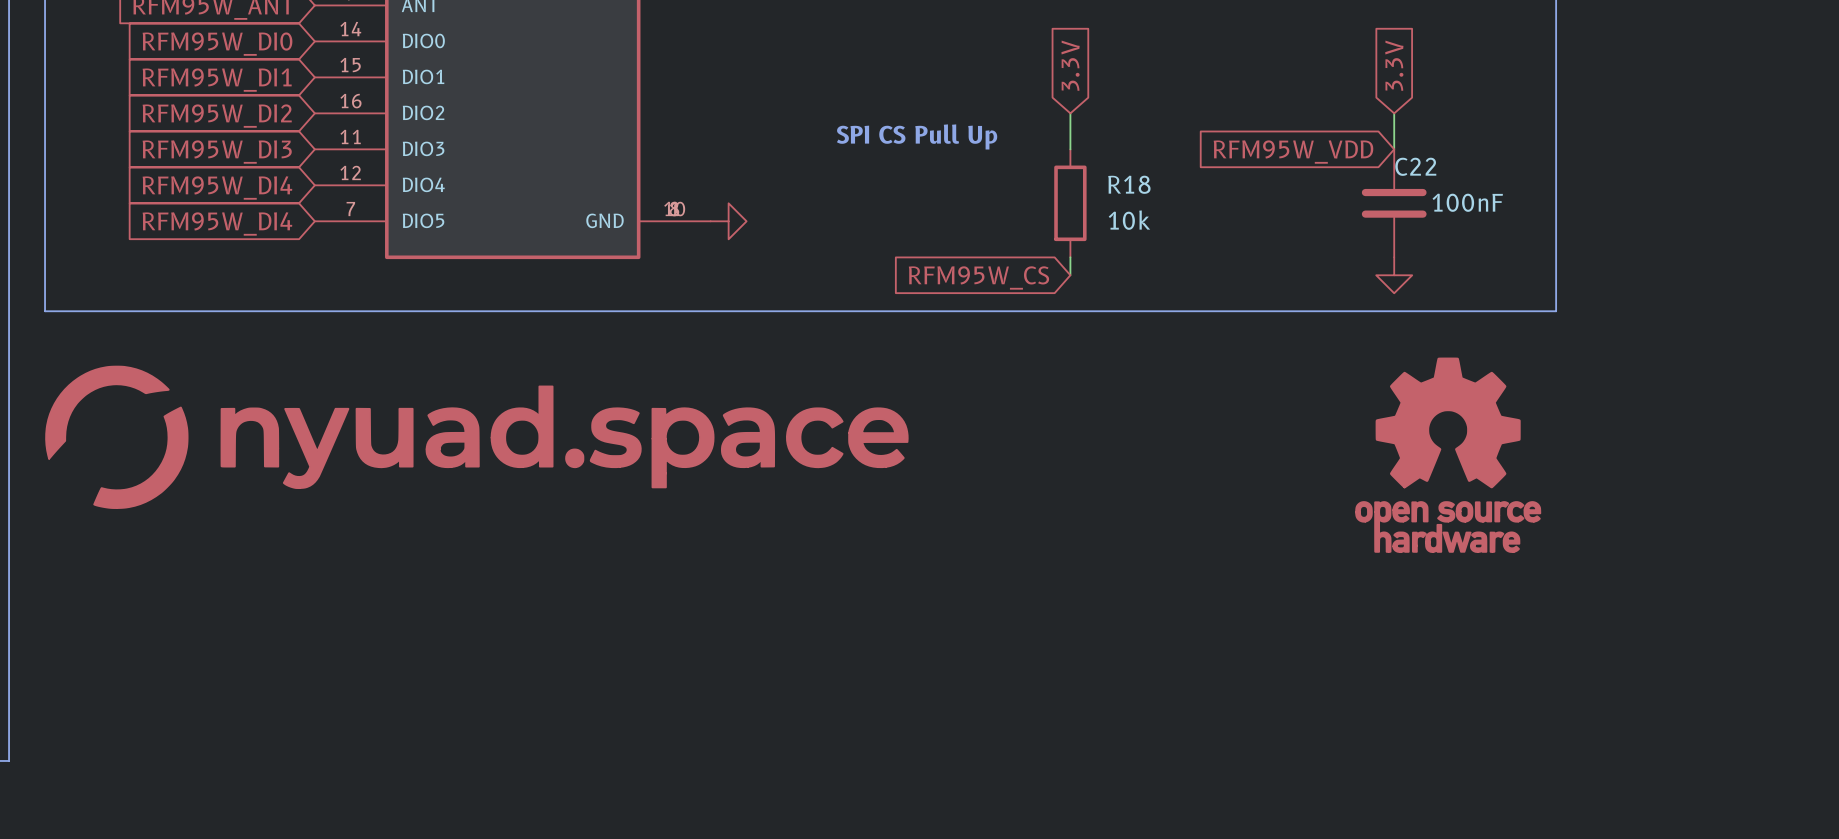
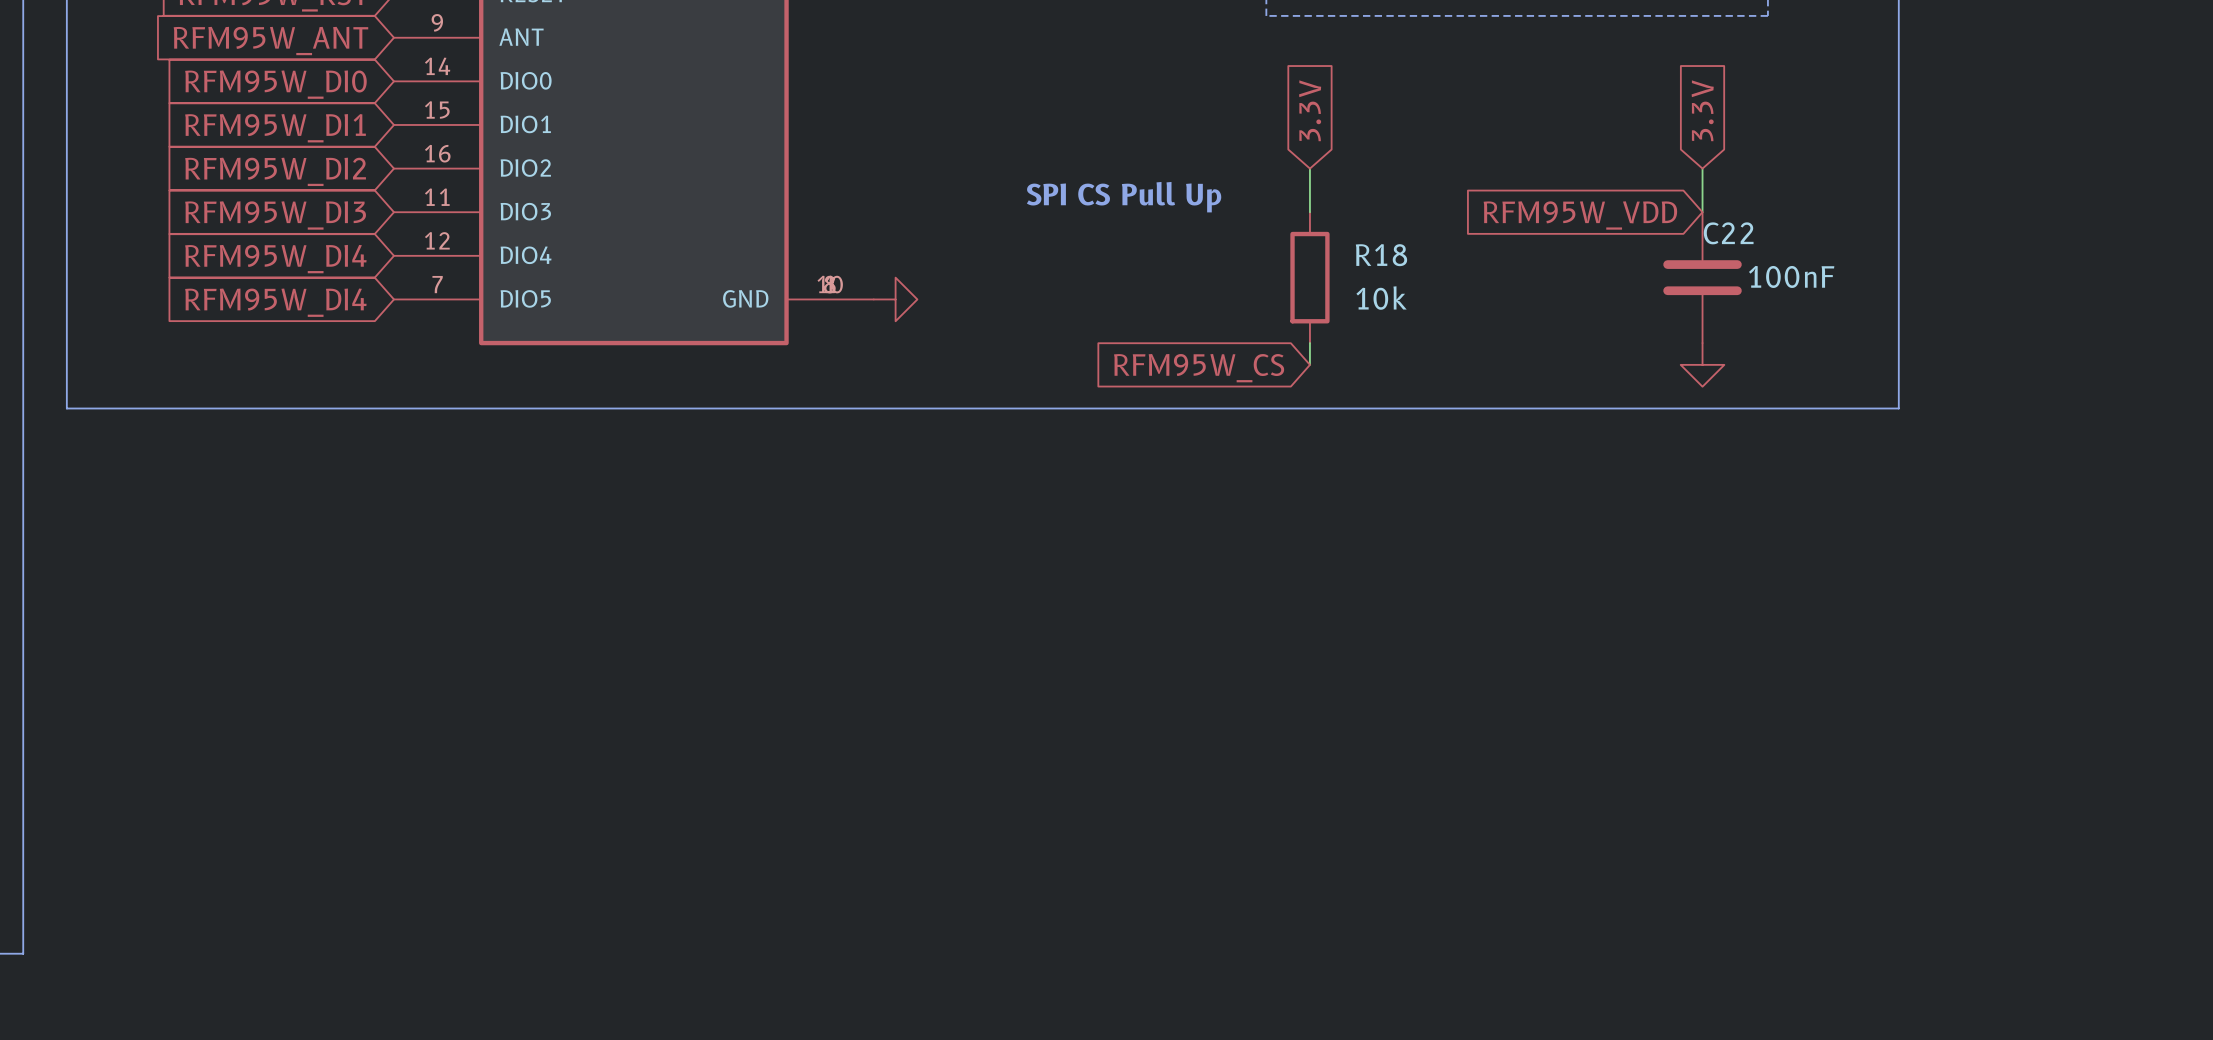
power symbol: (476, 437) -> none
power symbol: (1448, 455) -> none

